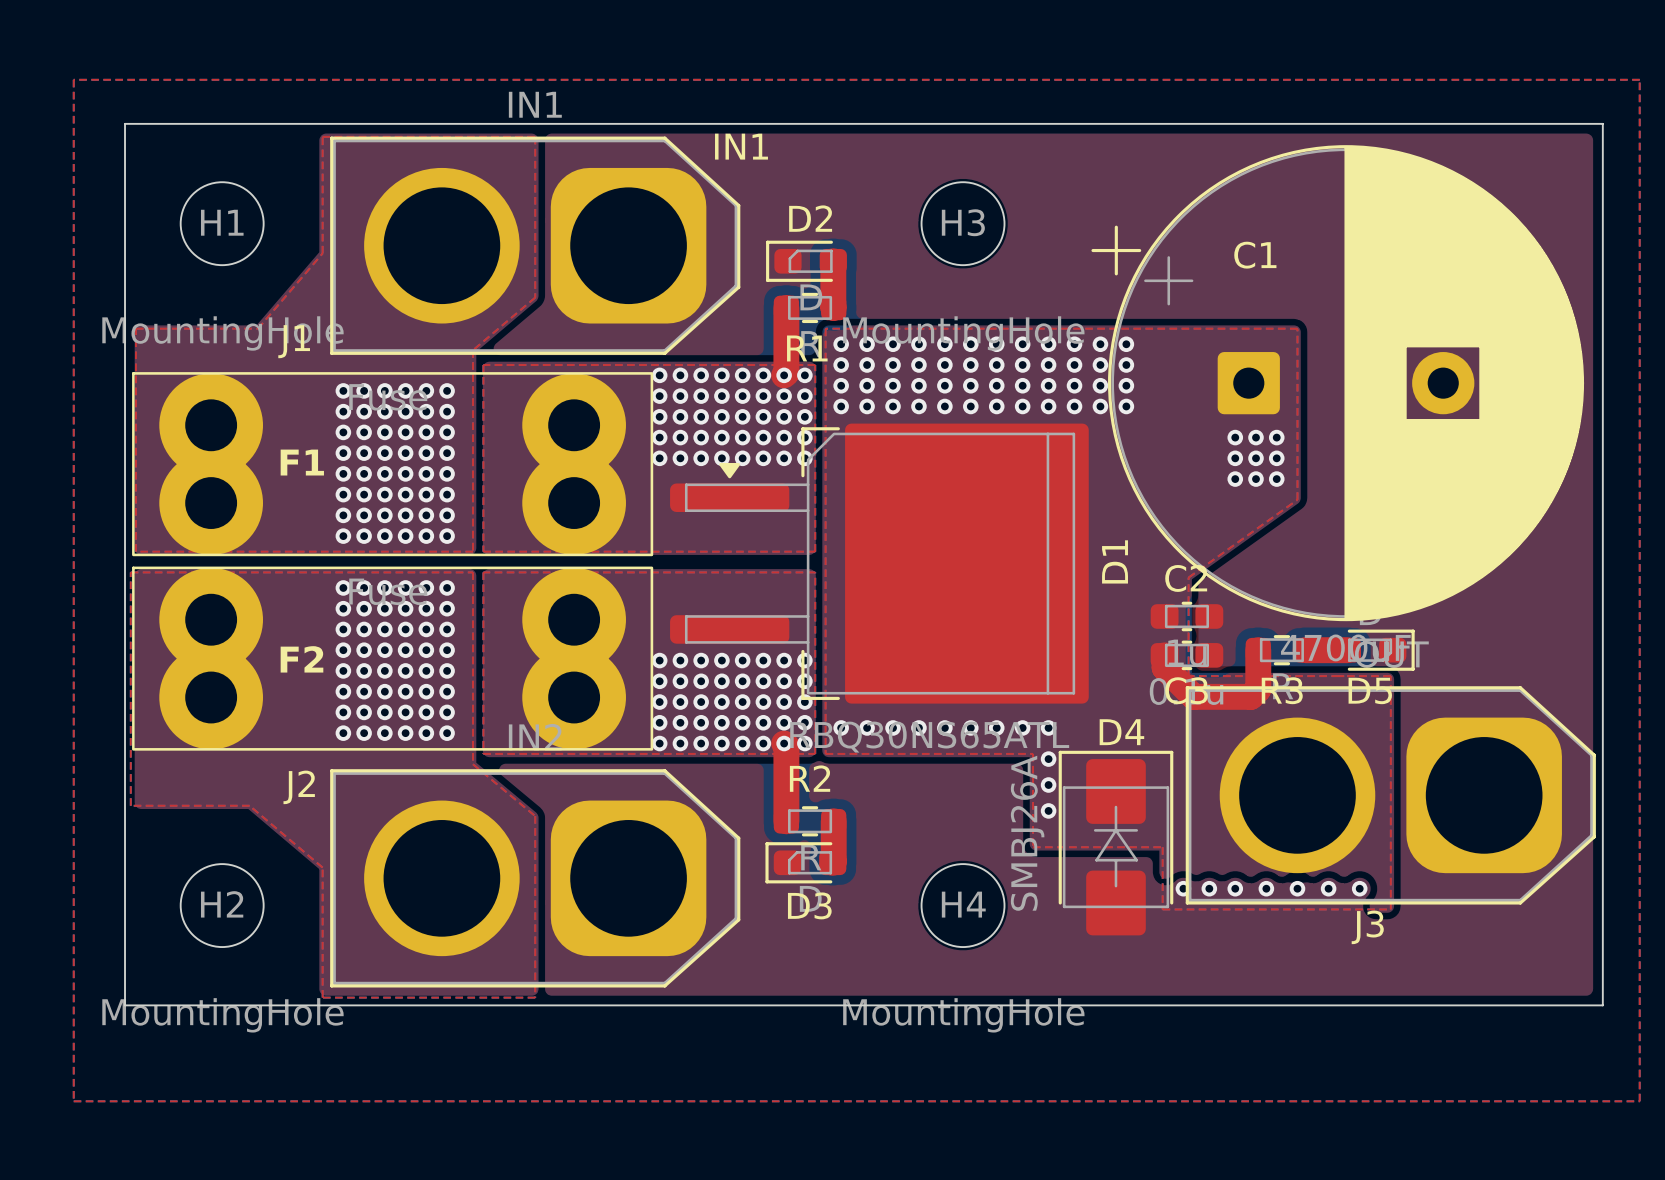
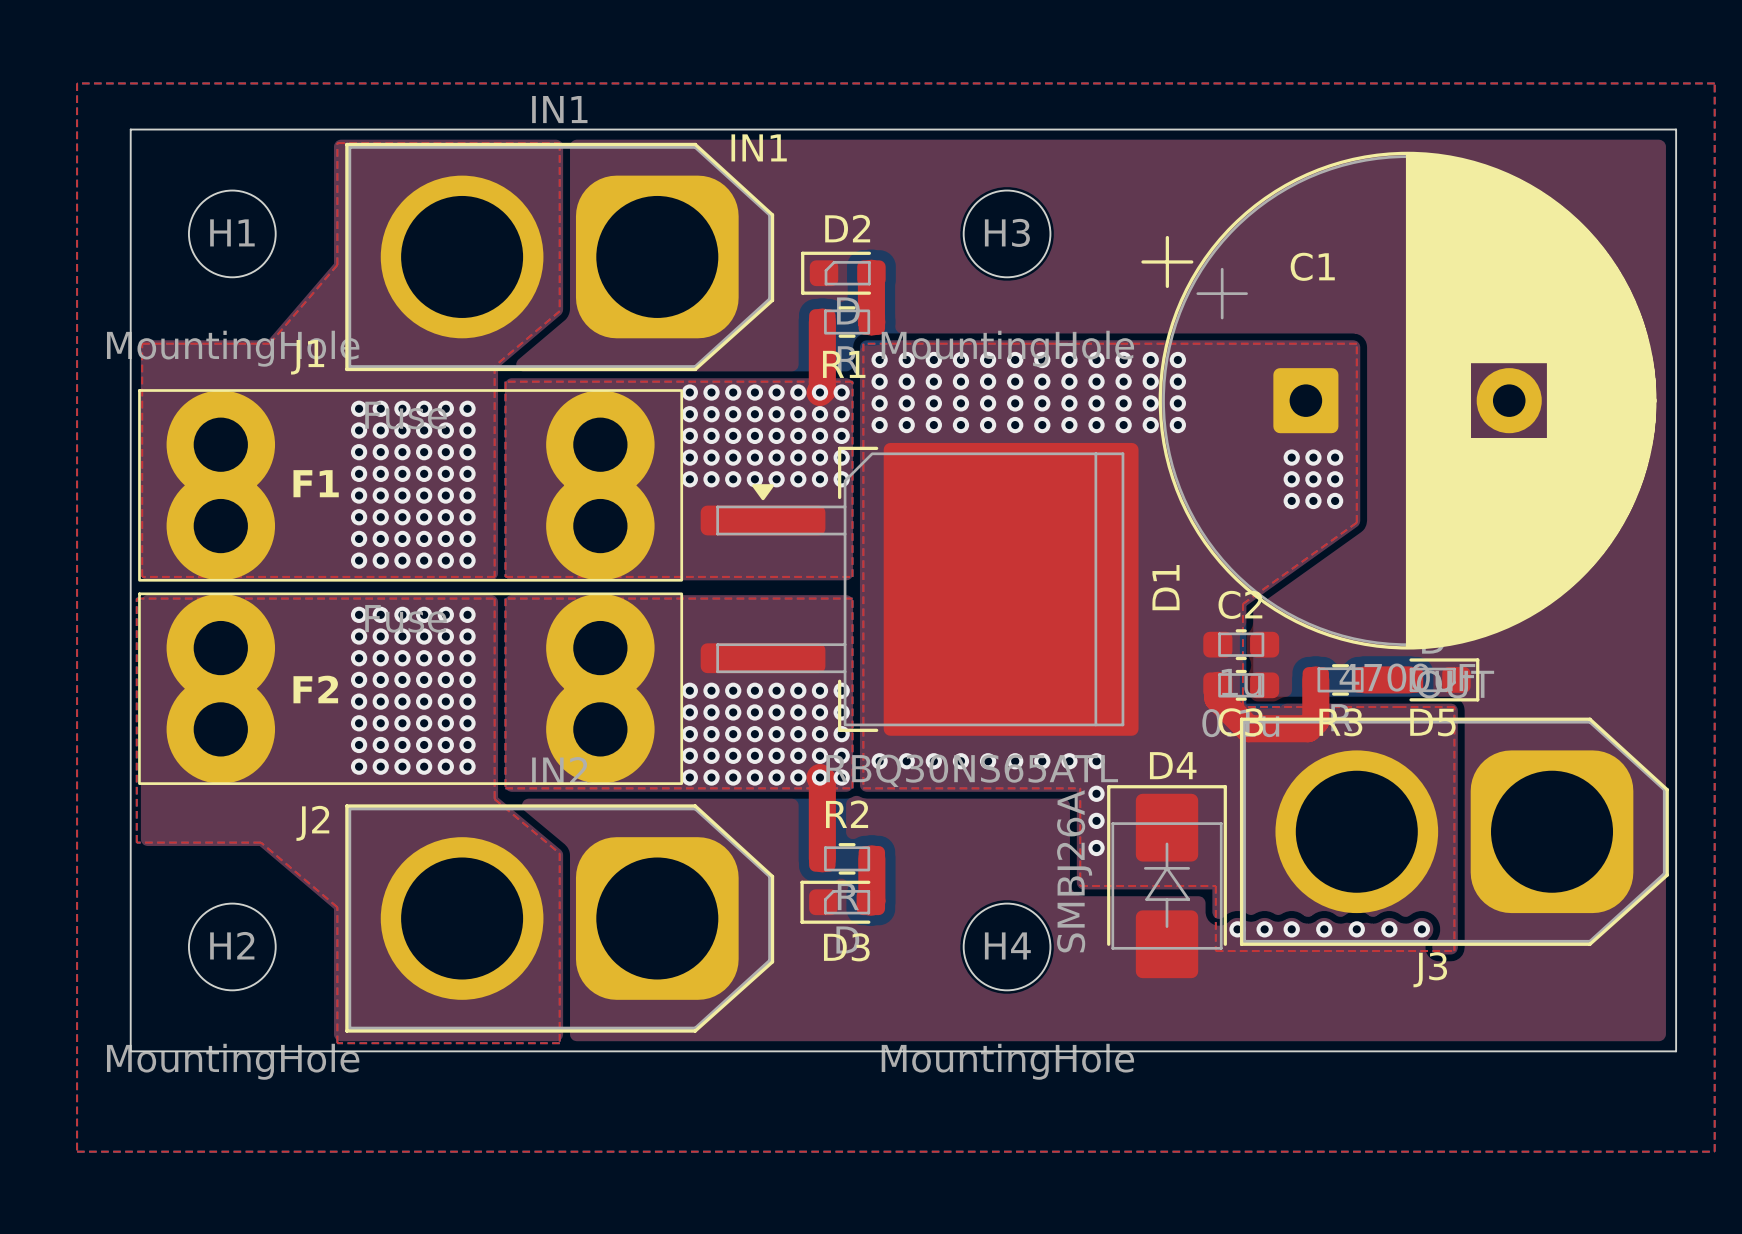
text position: IN1 (741, 146) -> IN1 (759, 147)

